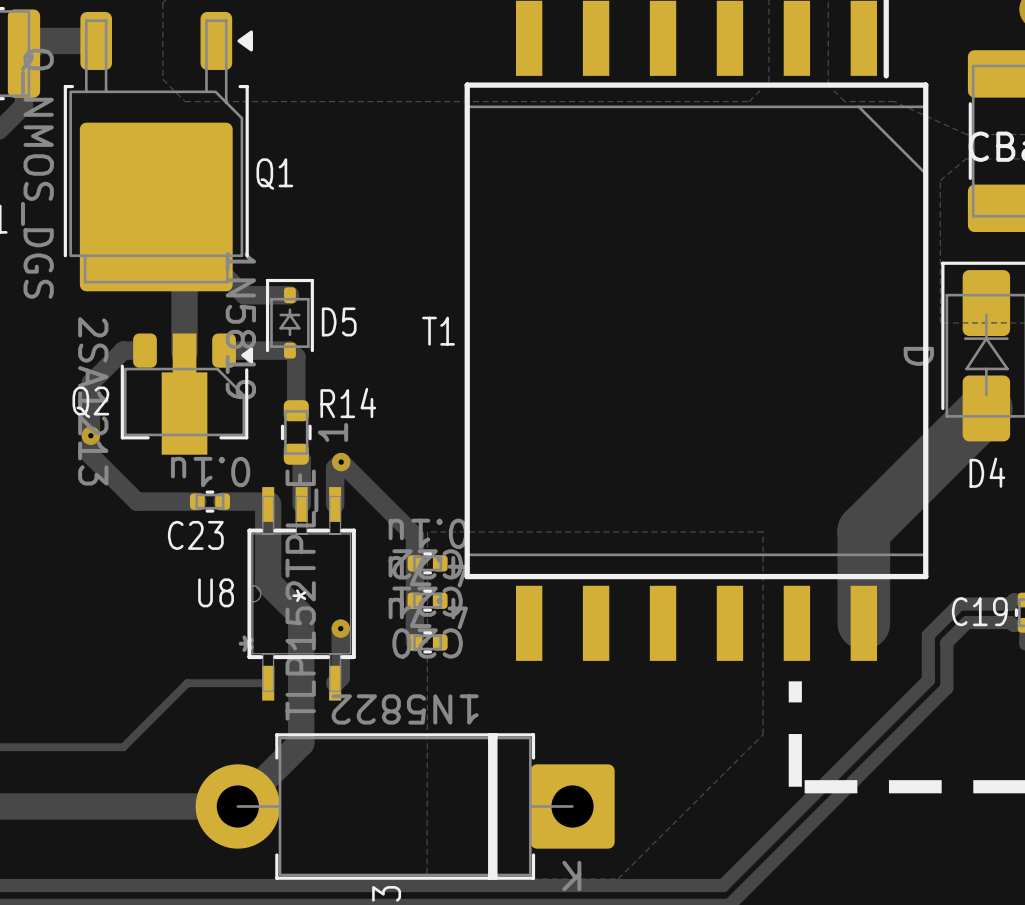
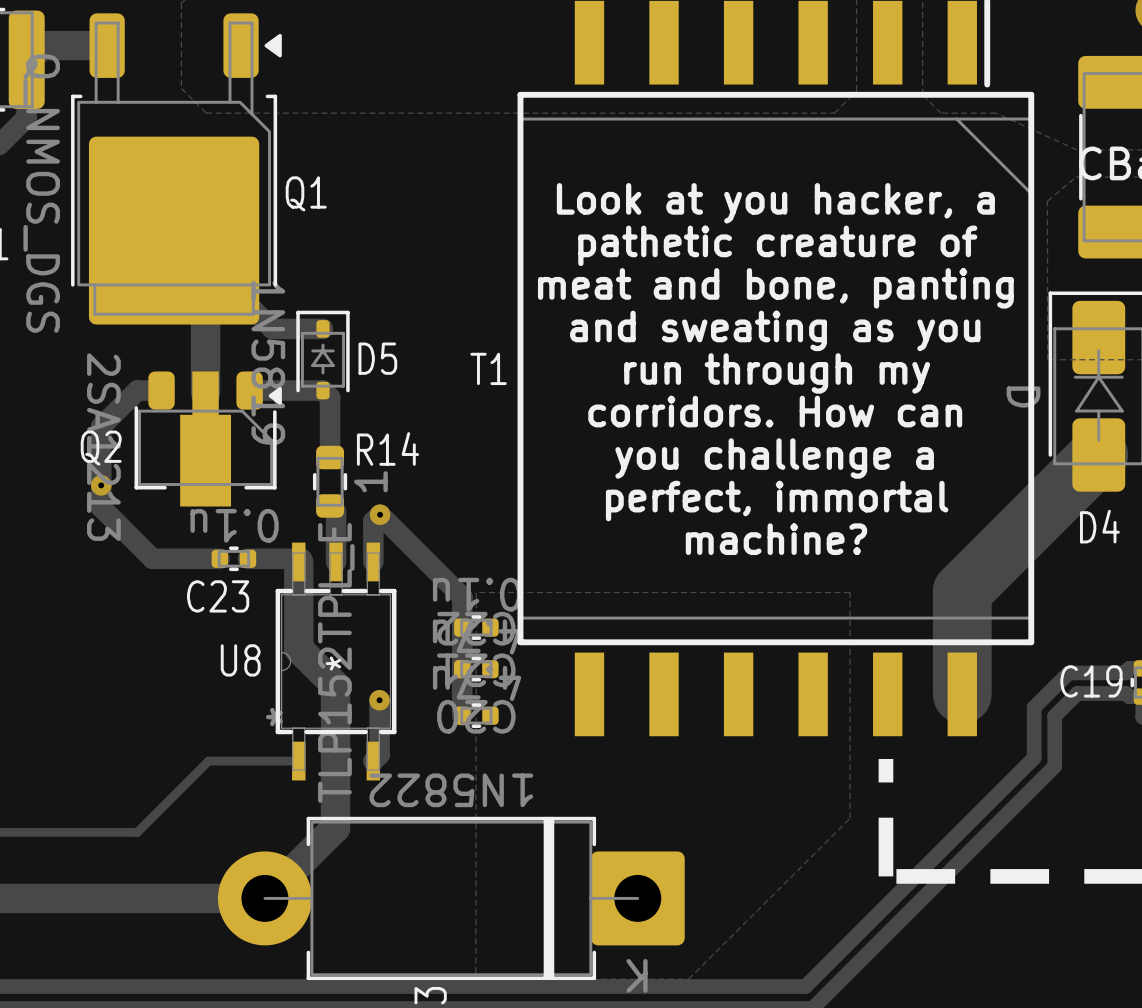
text: none -> Look at you hacker, a (775, 203)
text: none -> pathetic creature of (777, 245)
text: none -> meat and bone, panting (775, 288)
text: none -> and sweating as you (775, 330)
text: none -> run through my (777, 373)
text: none -> corridors. How can (775, 411)
text: none -> you challenge a (774, 458)
text: none -> perfect, immortal (777, 501)
text: none -> machine? (776, 539)

